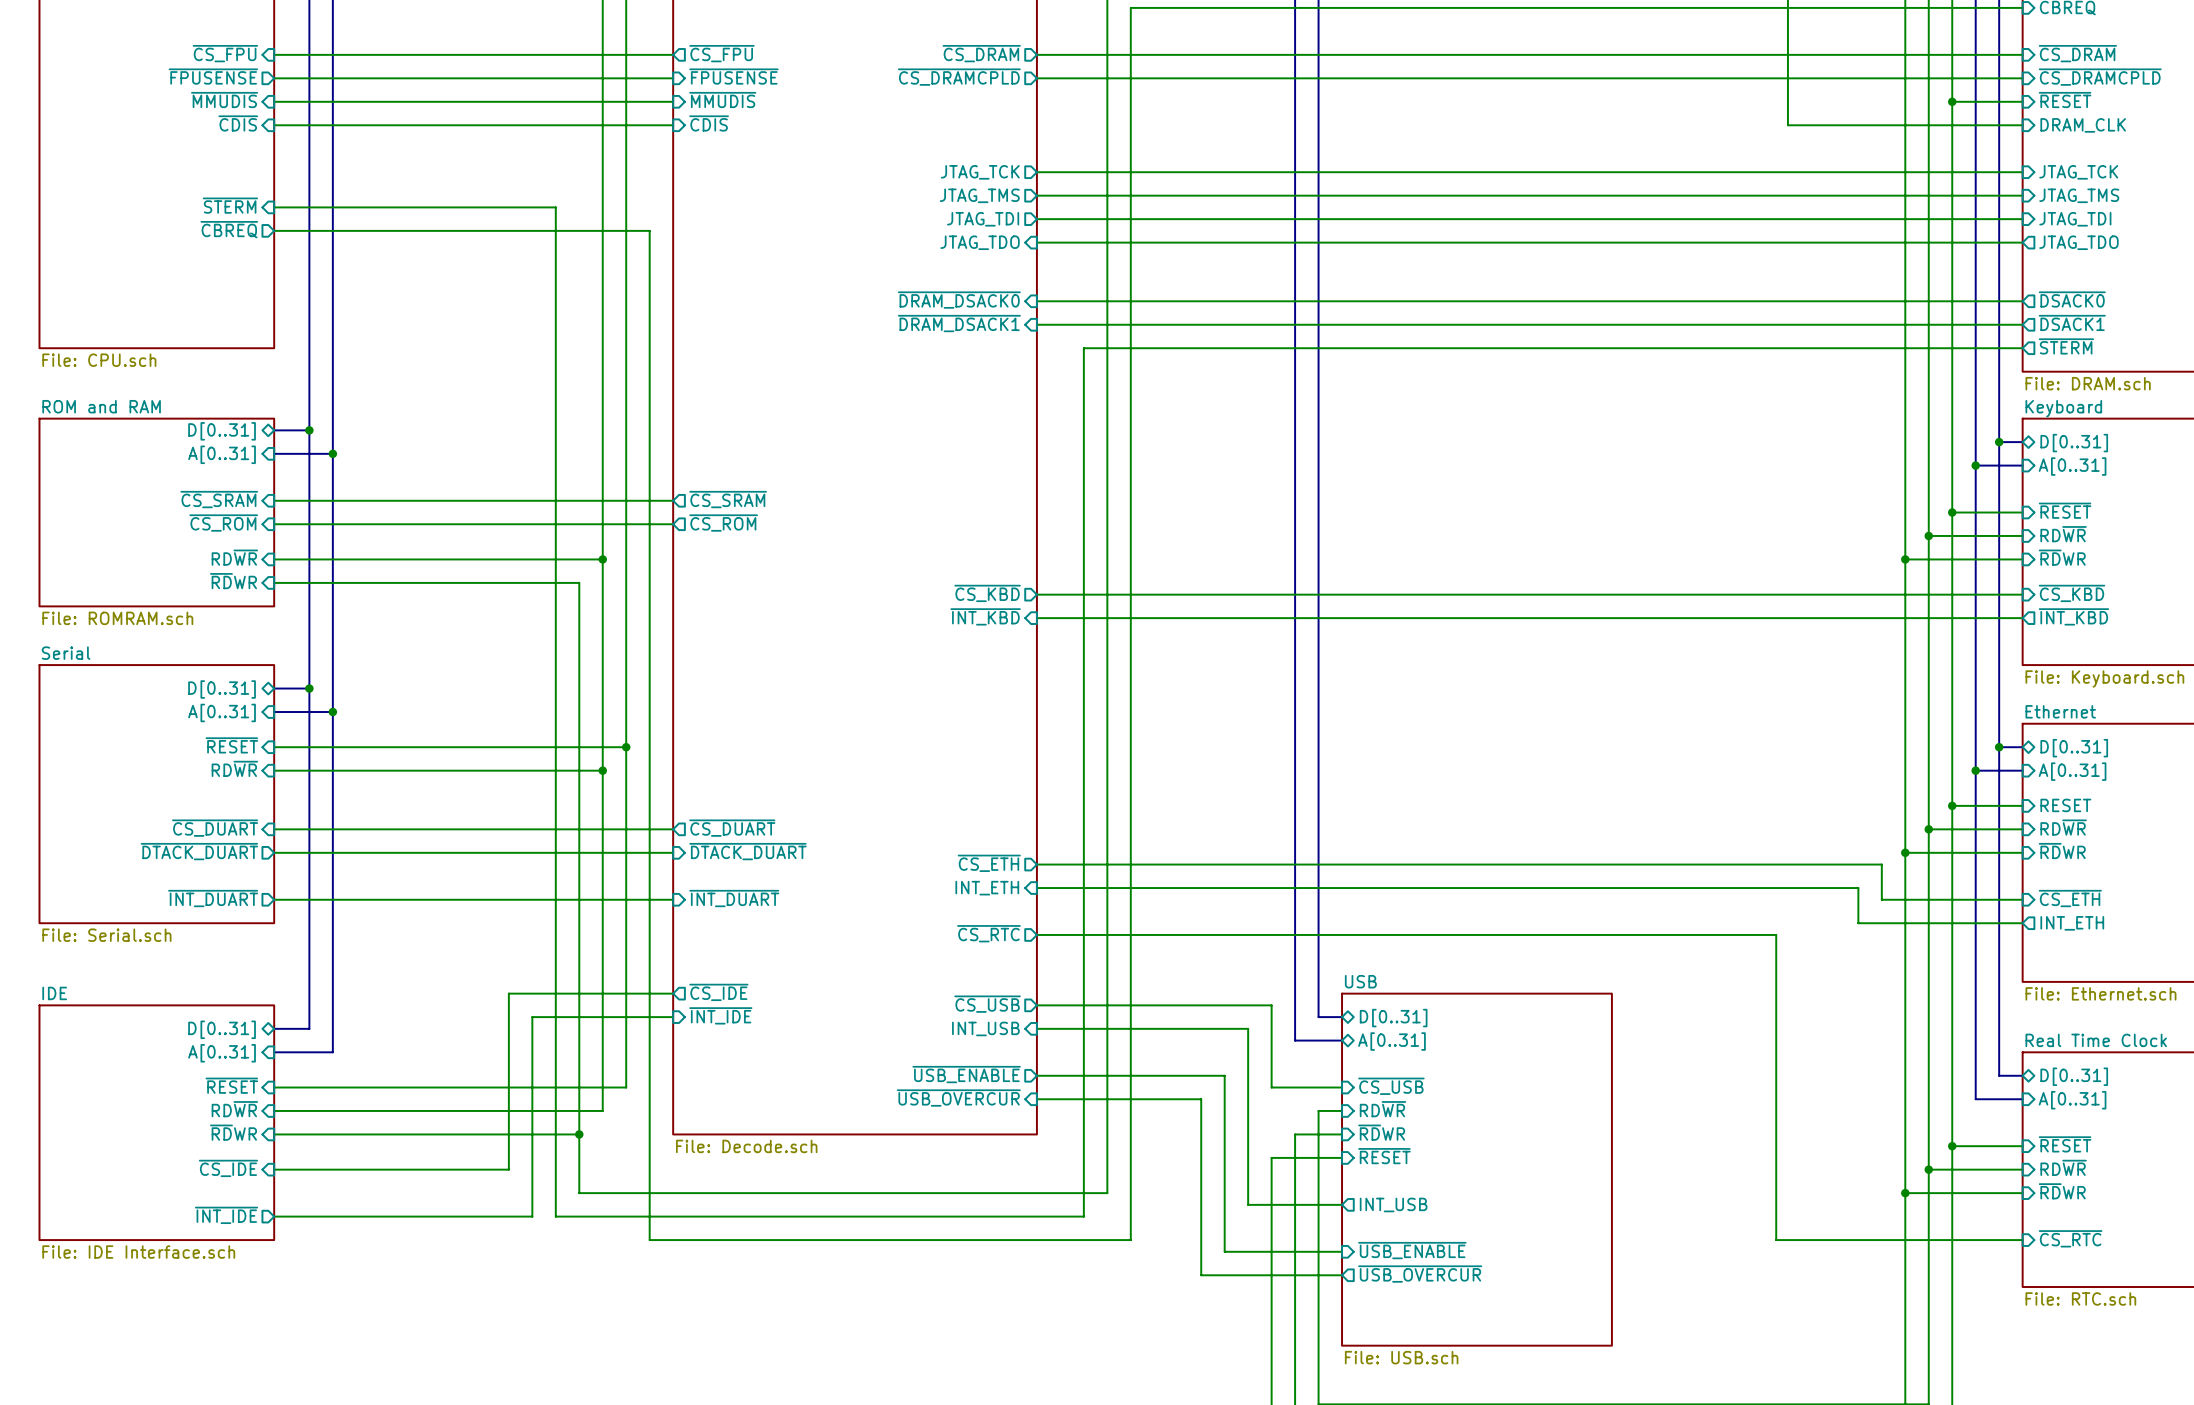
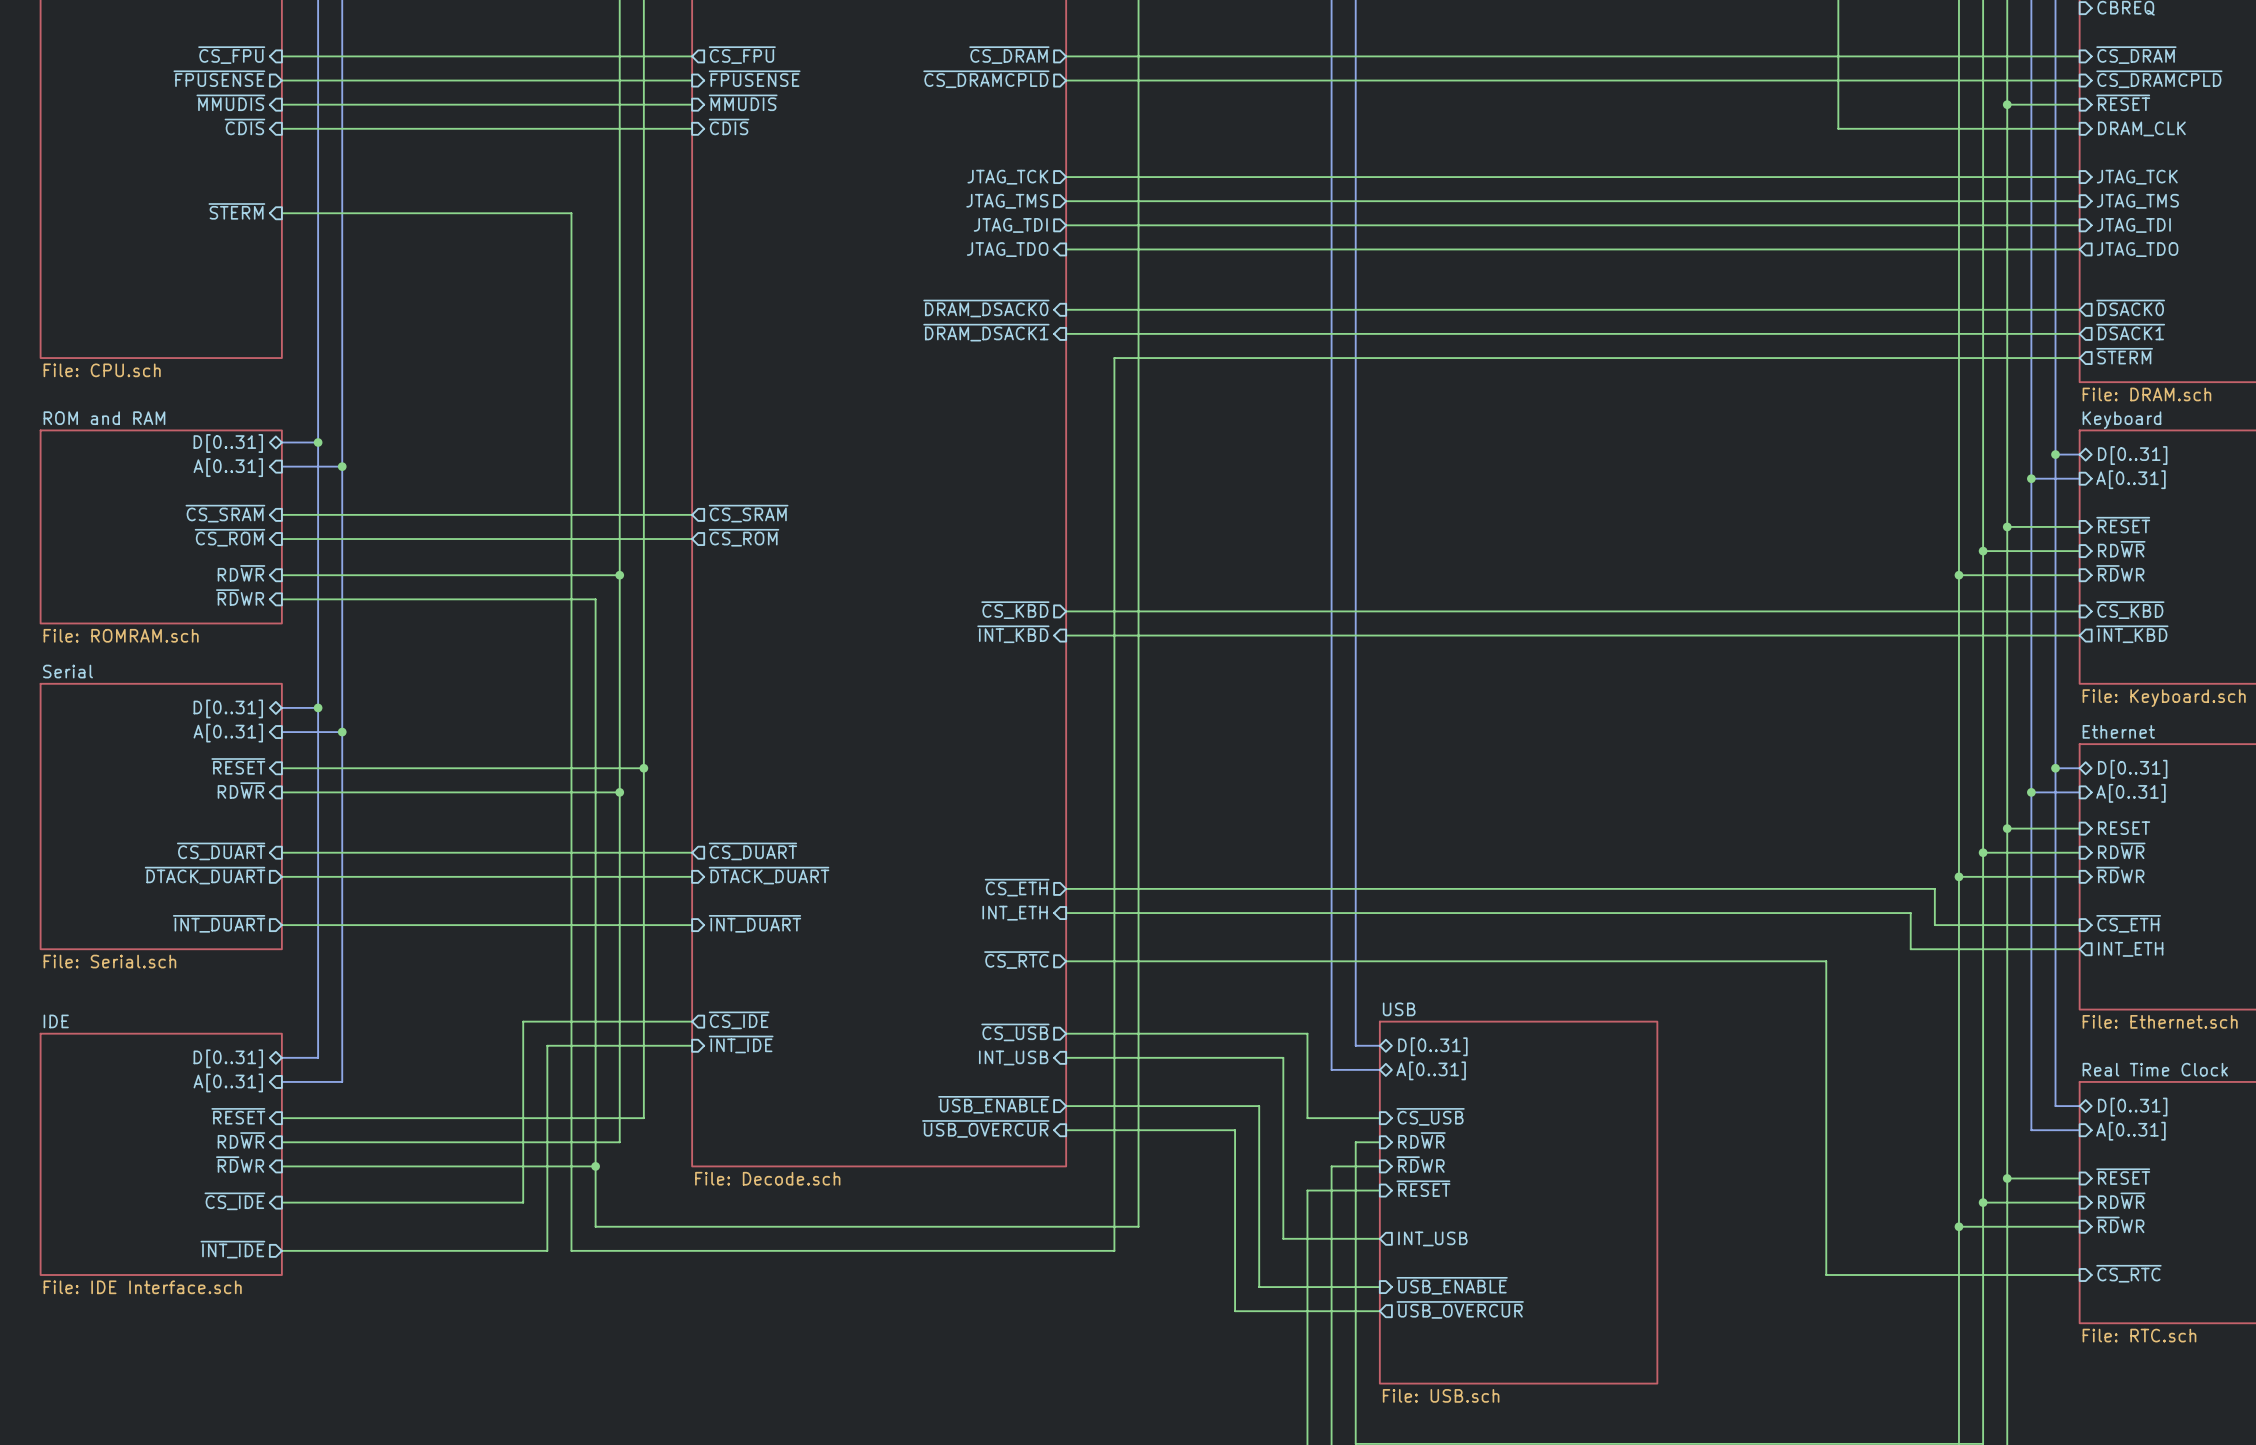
wire: (2022, 7) (1130, 7) (1130, 1240) (649, 1240) (649, 230) (274, 230) -> none
sheet pin: ~{CBREQ} (229, 229) -> none

